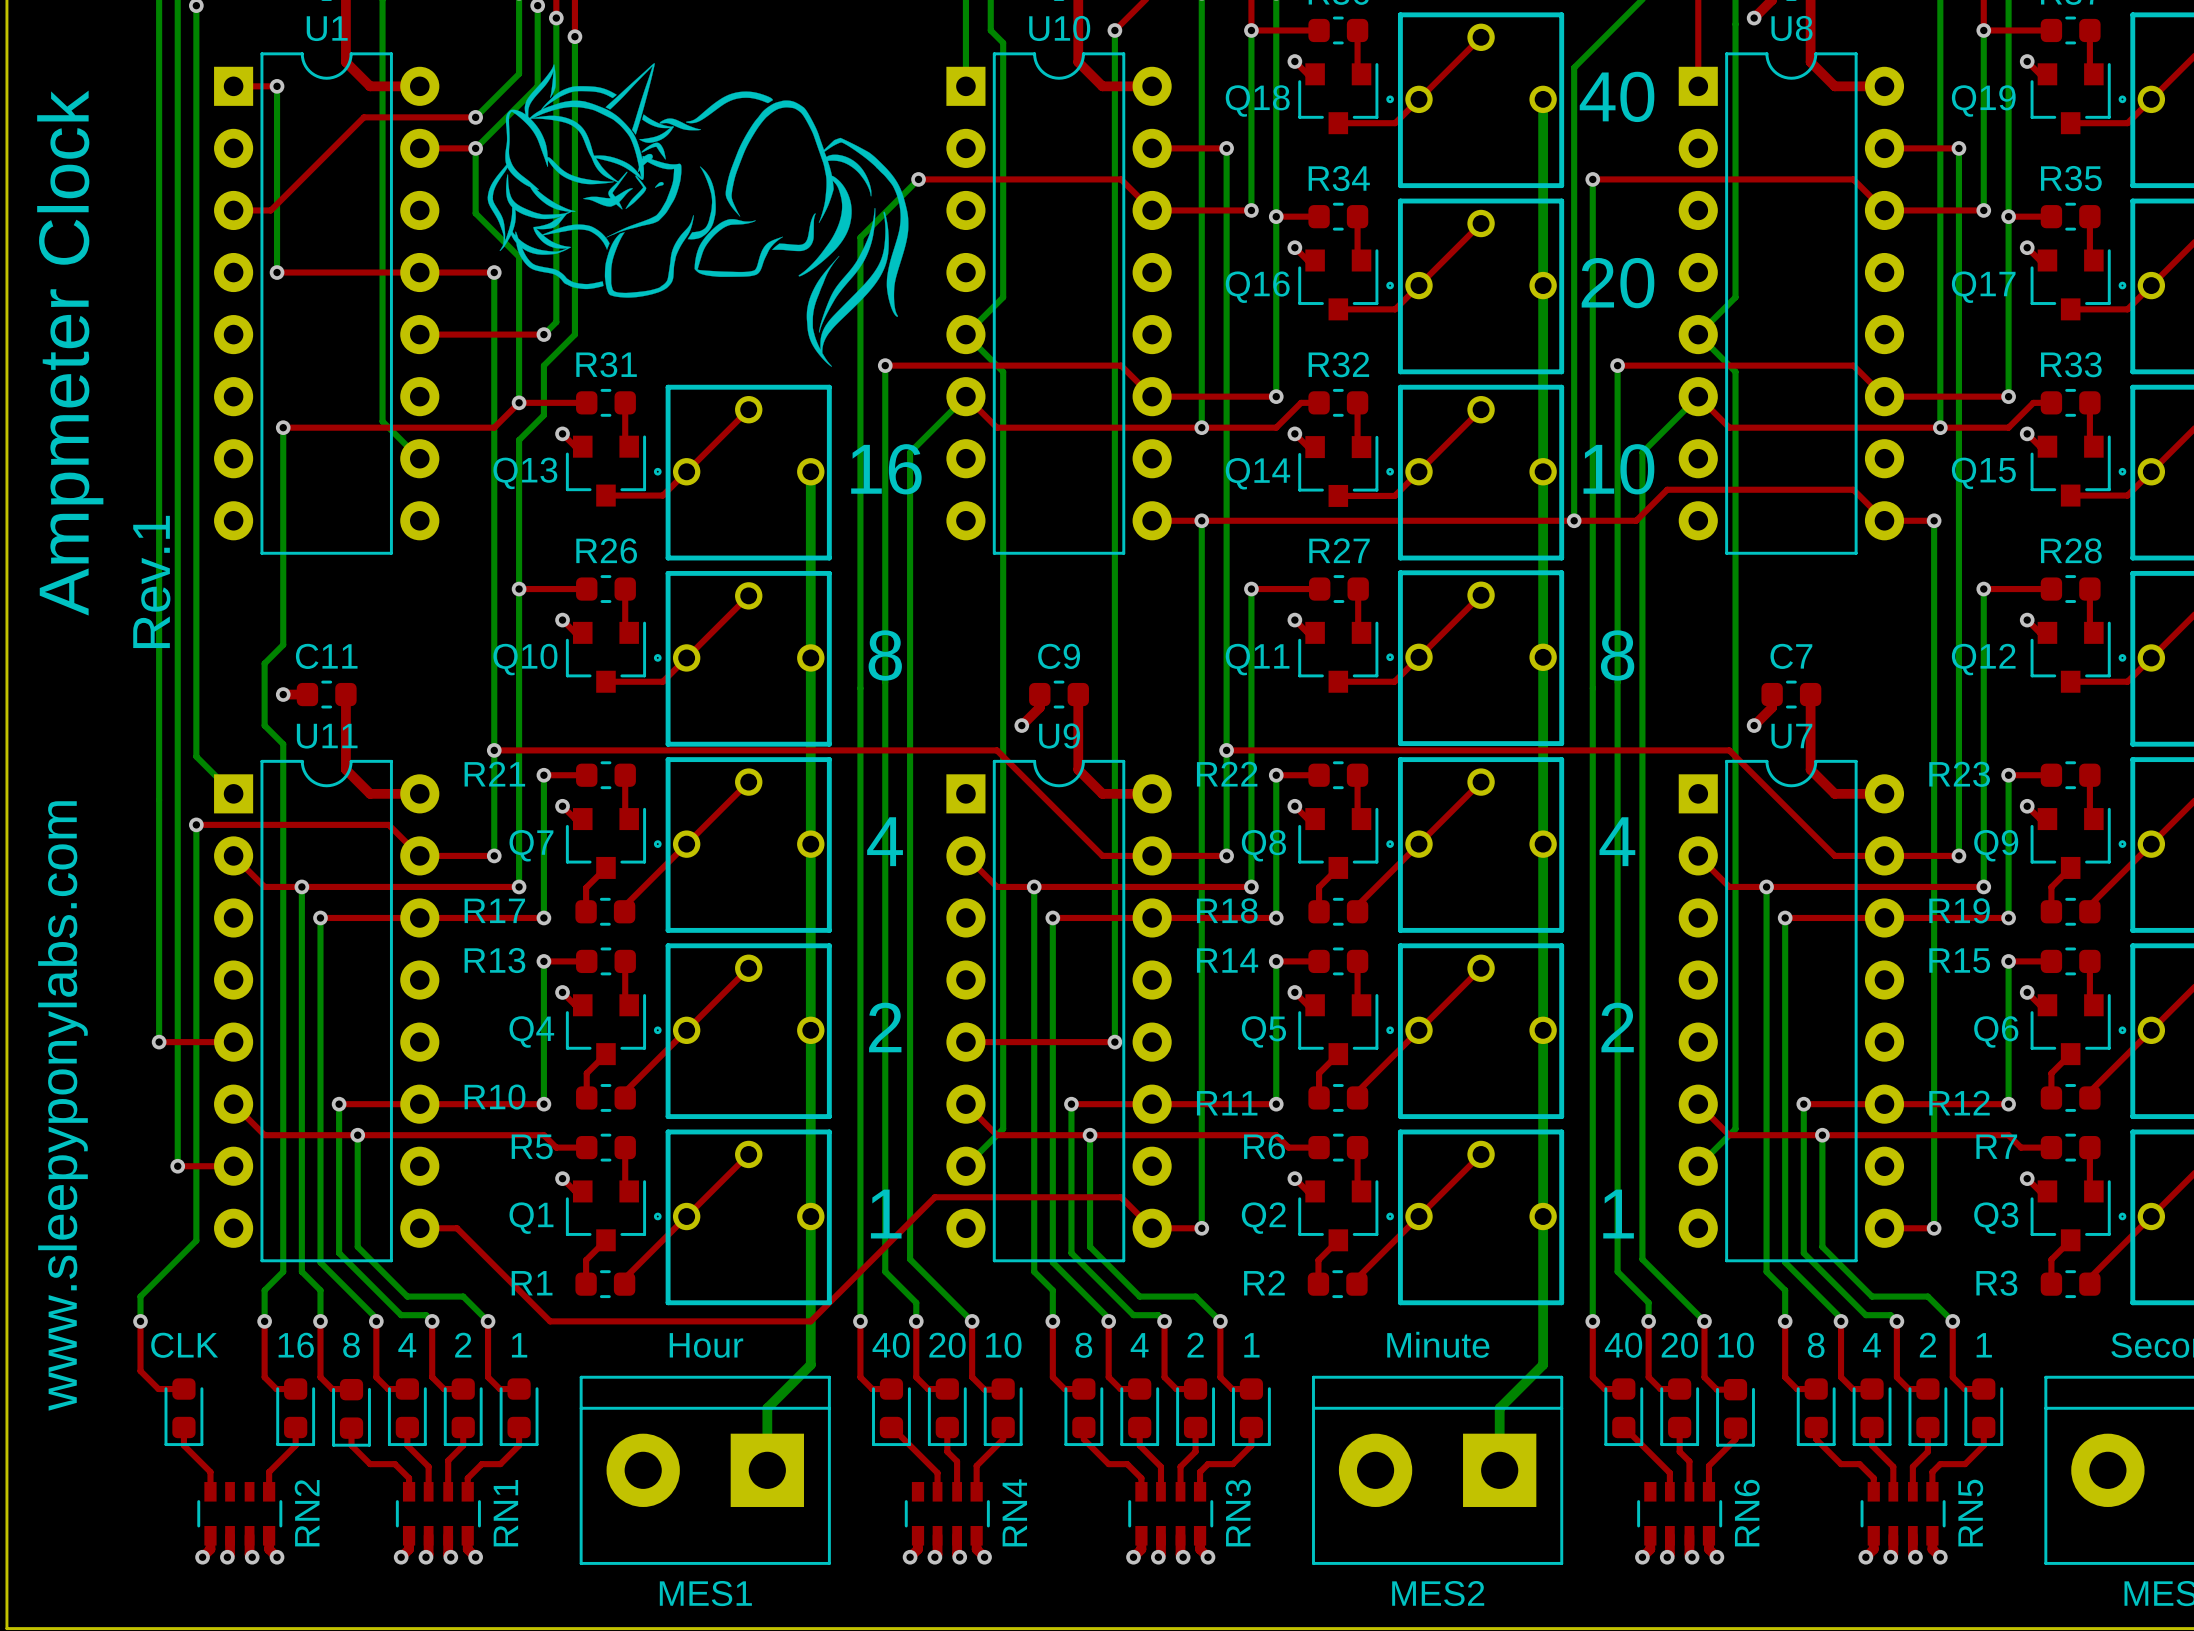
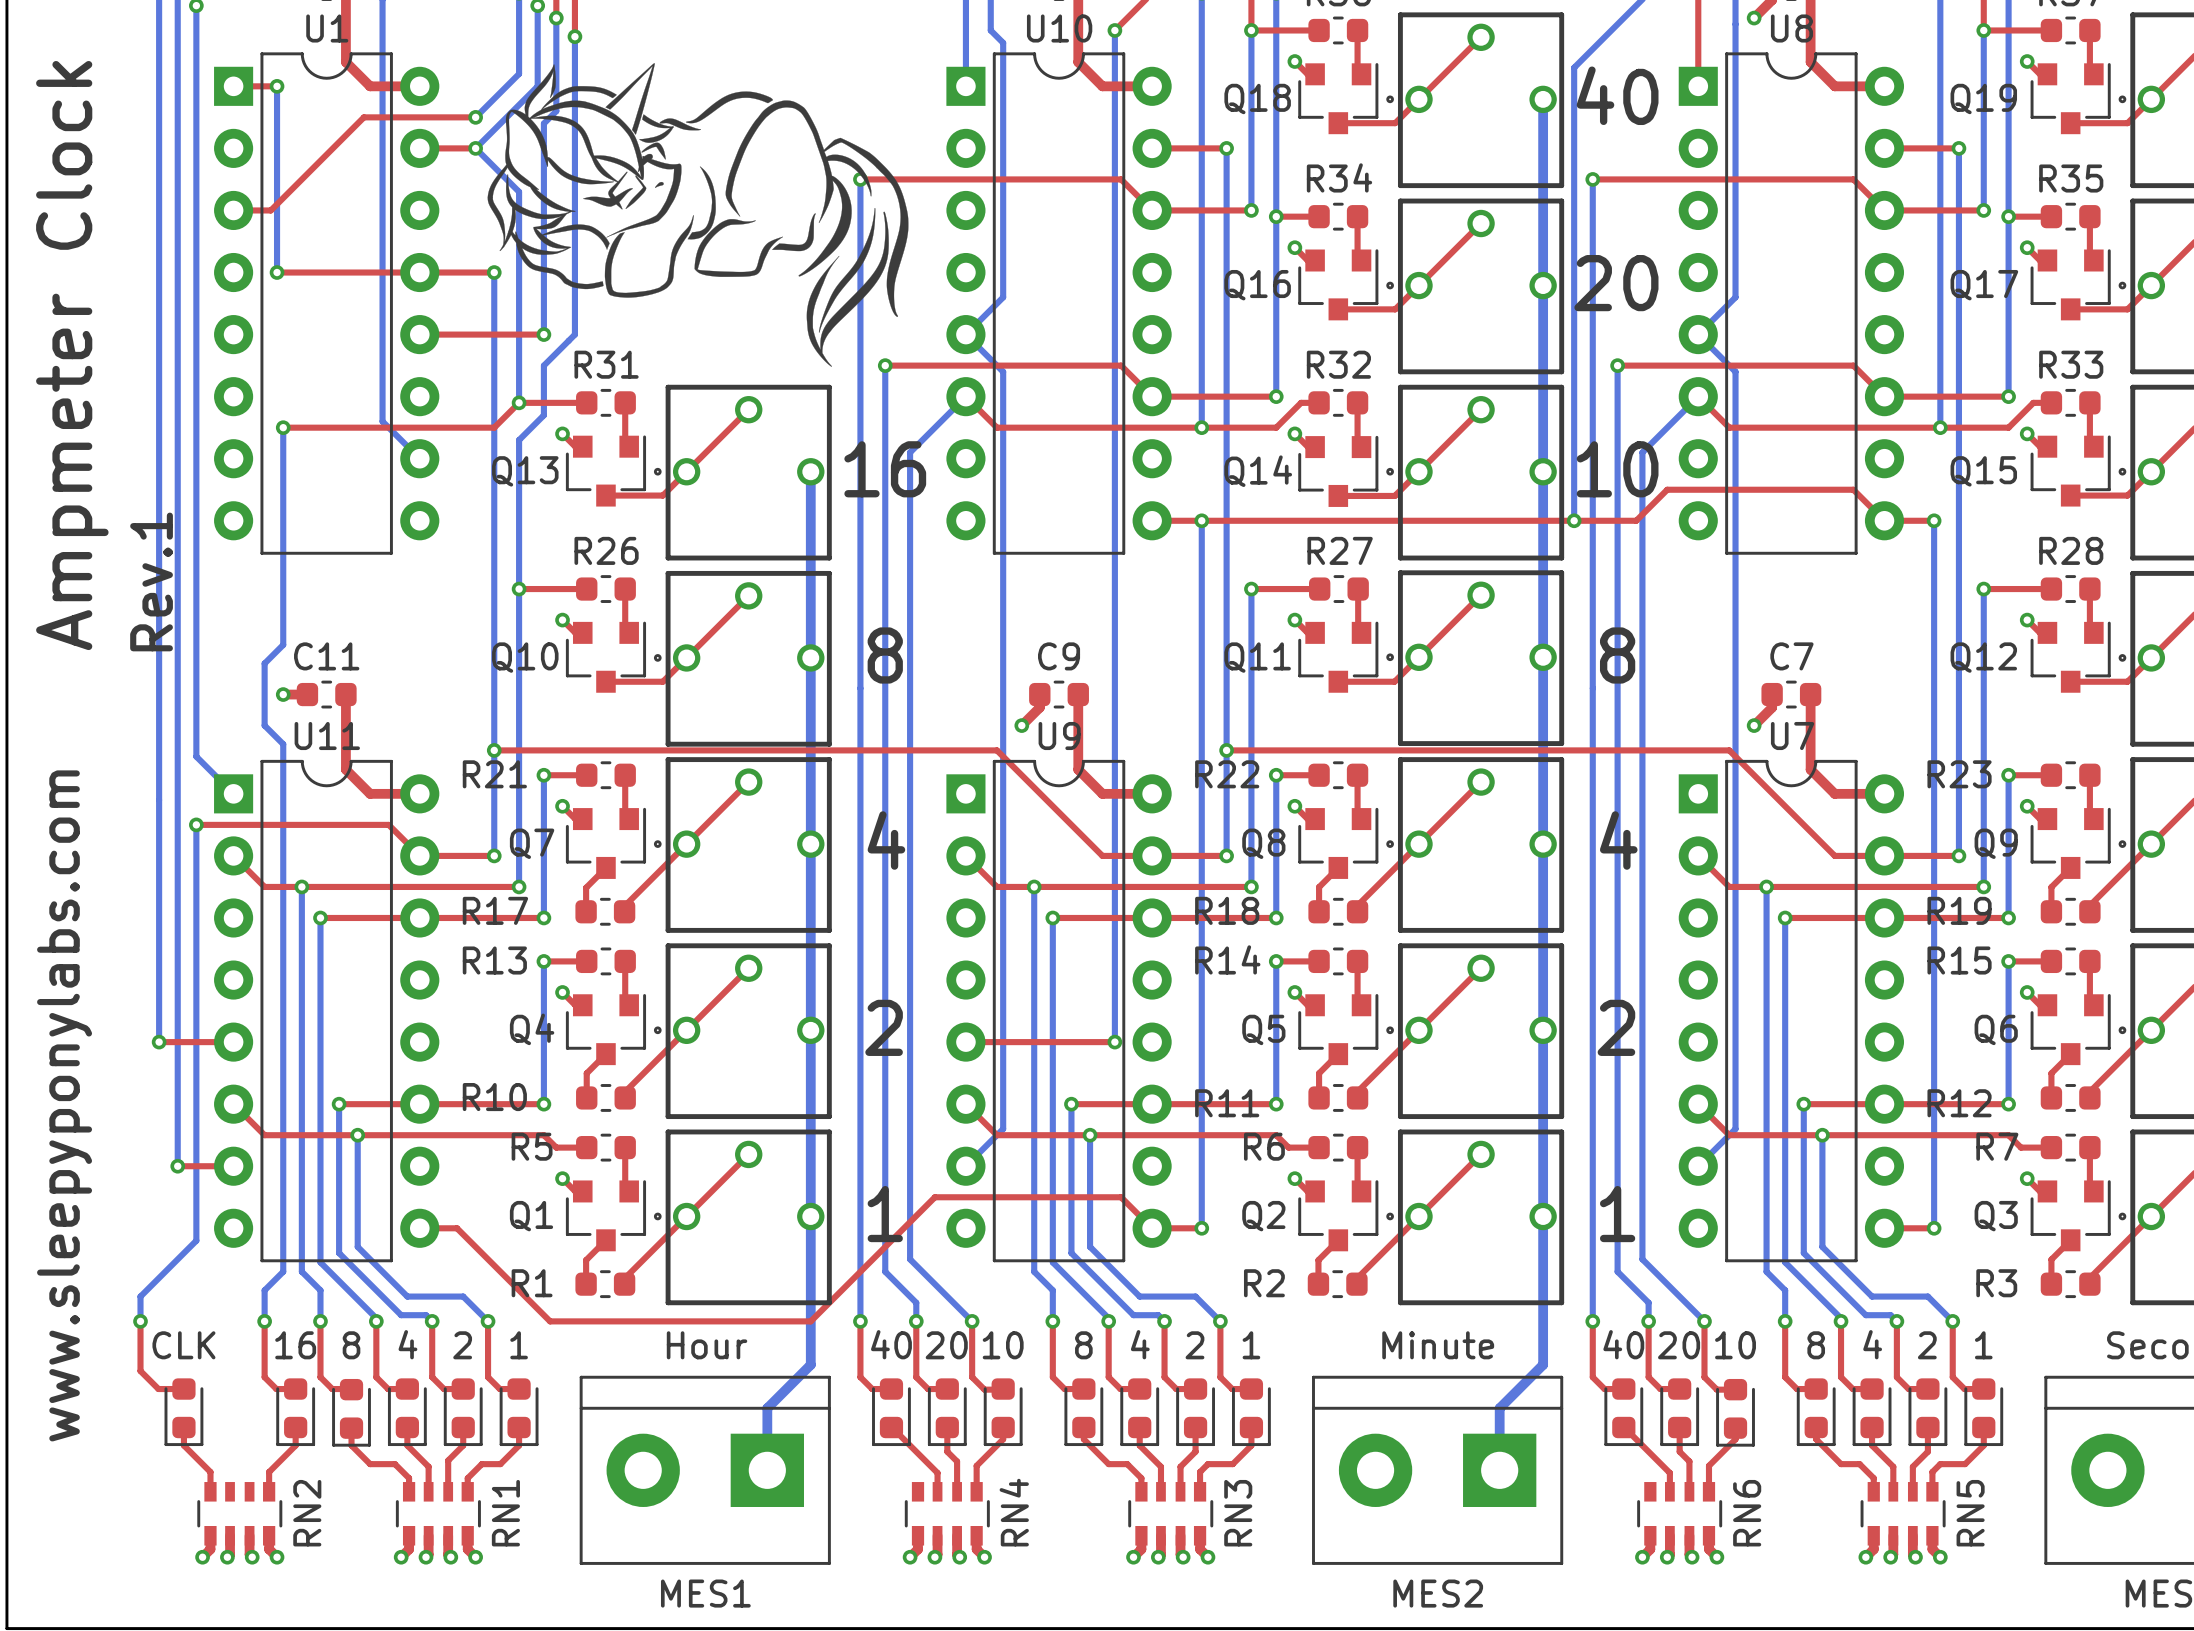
bottom track: (556, 111) (556, 322) (543, 334) -> (556, 111) (543, 123) (543, 334)
bottom track: (475, 148) (475, 213) (519, 256) -> (475, 148) (519, 191) (519, 256)
top track: none -> (860, 179) (918, 179)
bottom track: (918, 179) (860, 237) -> (860, 179) (860, 237)
via position: (918, 179) -> (860, 179)

